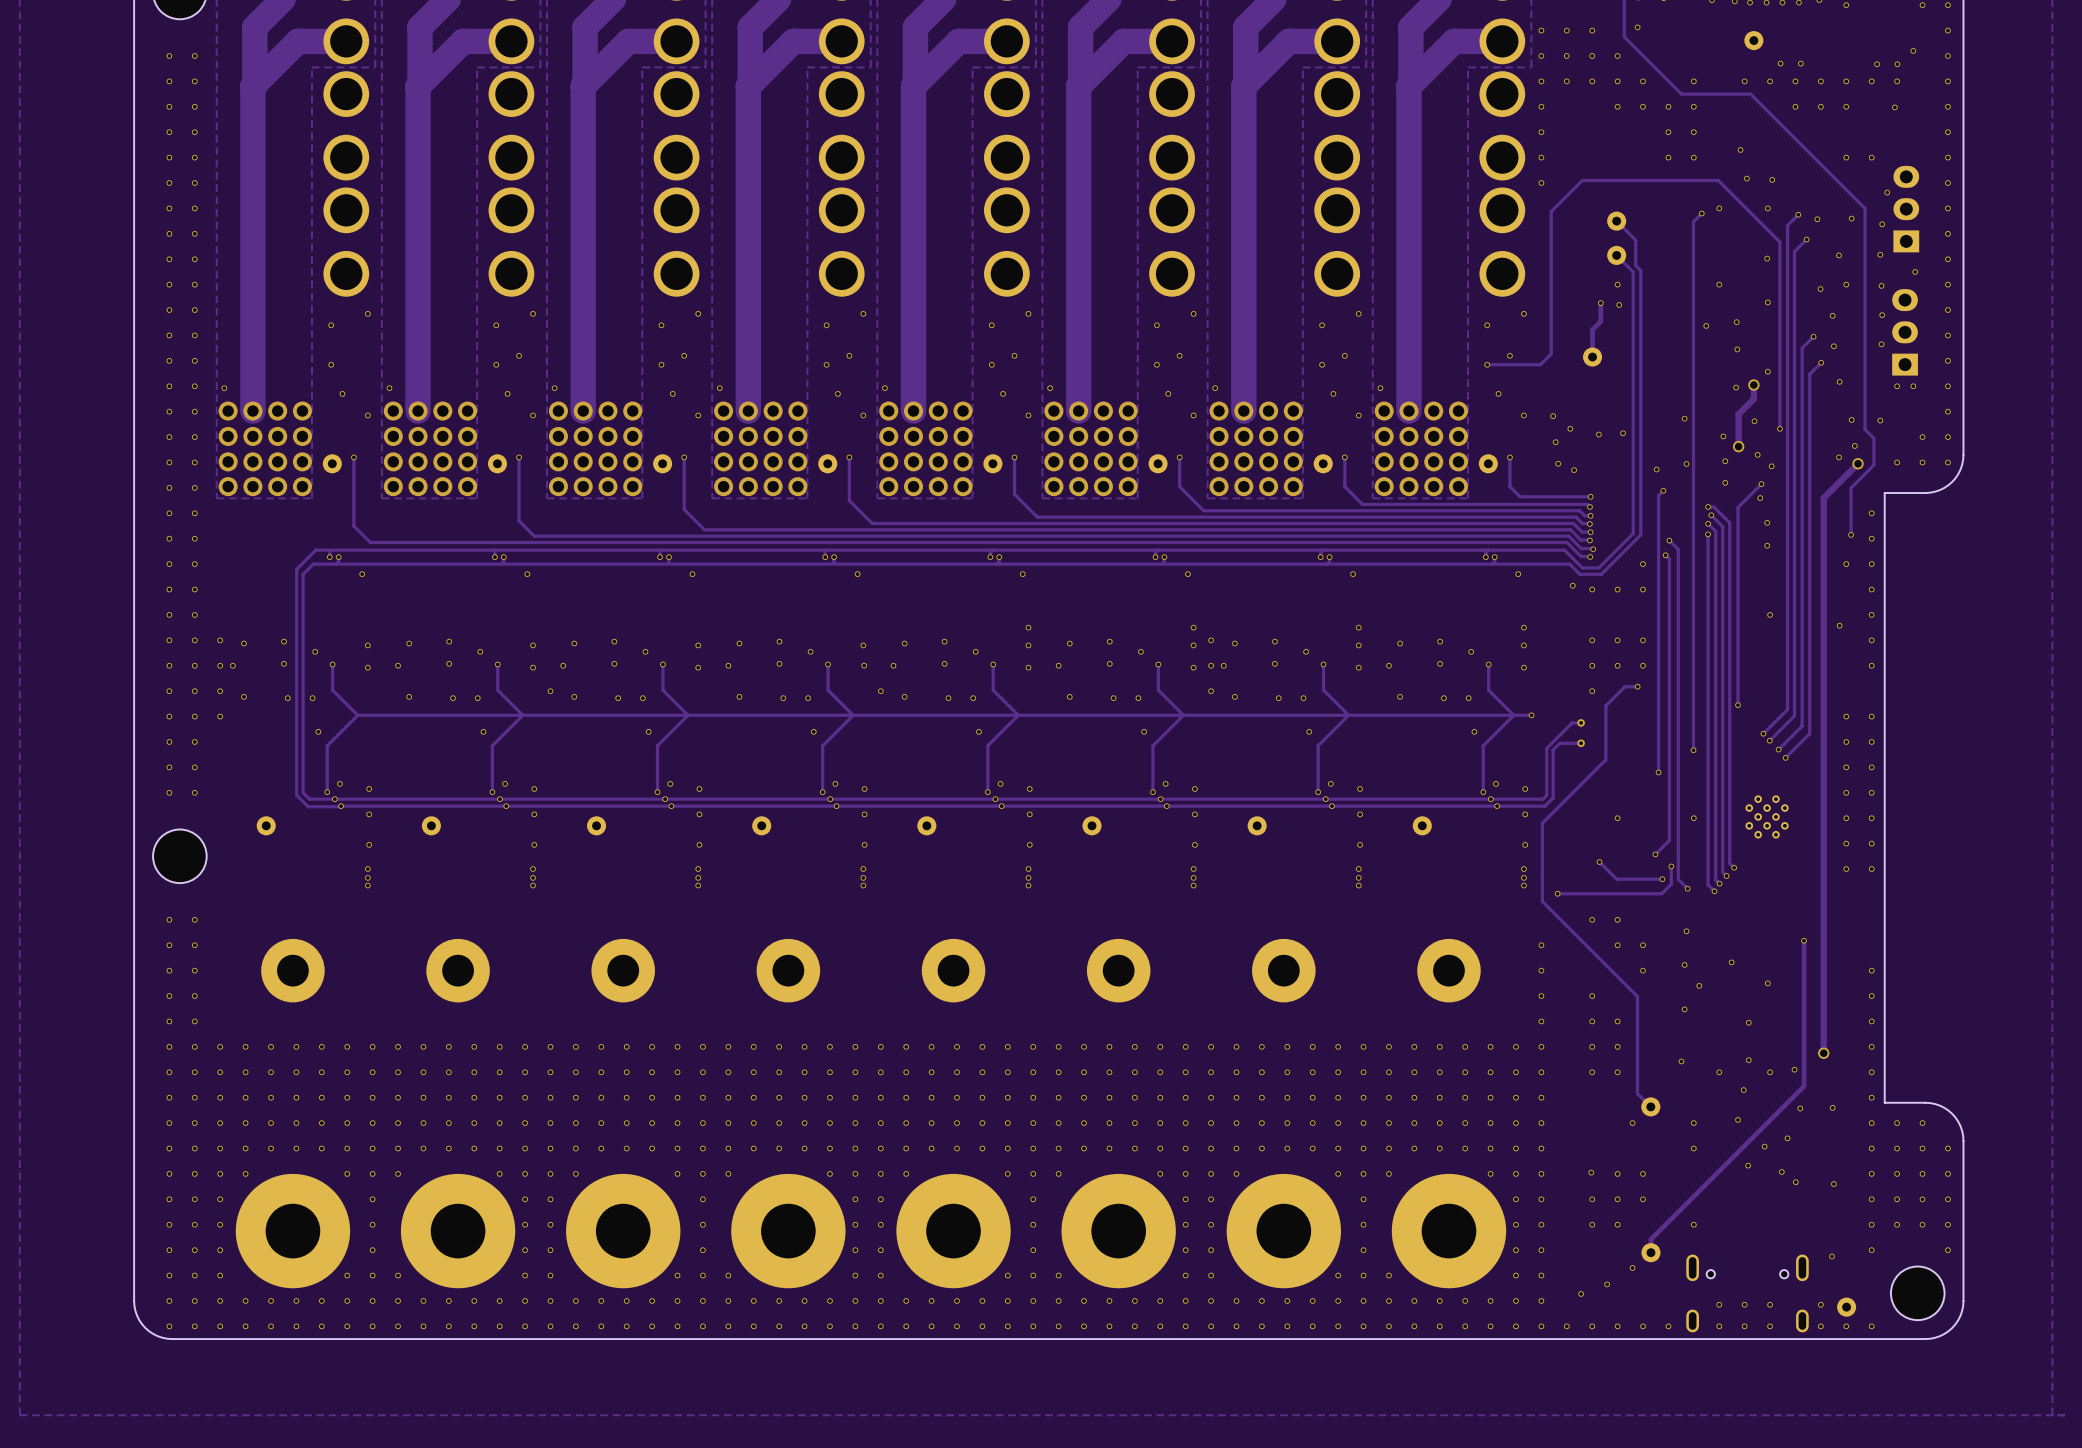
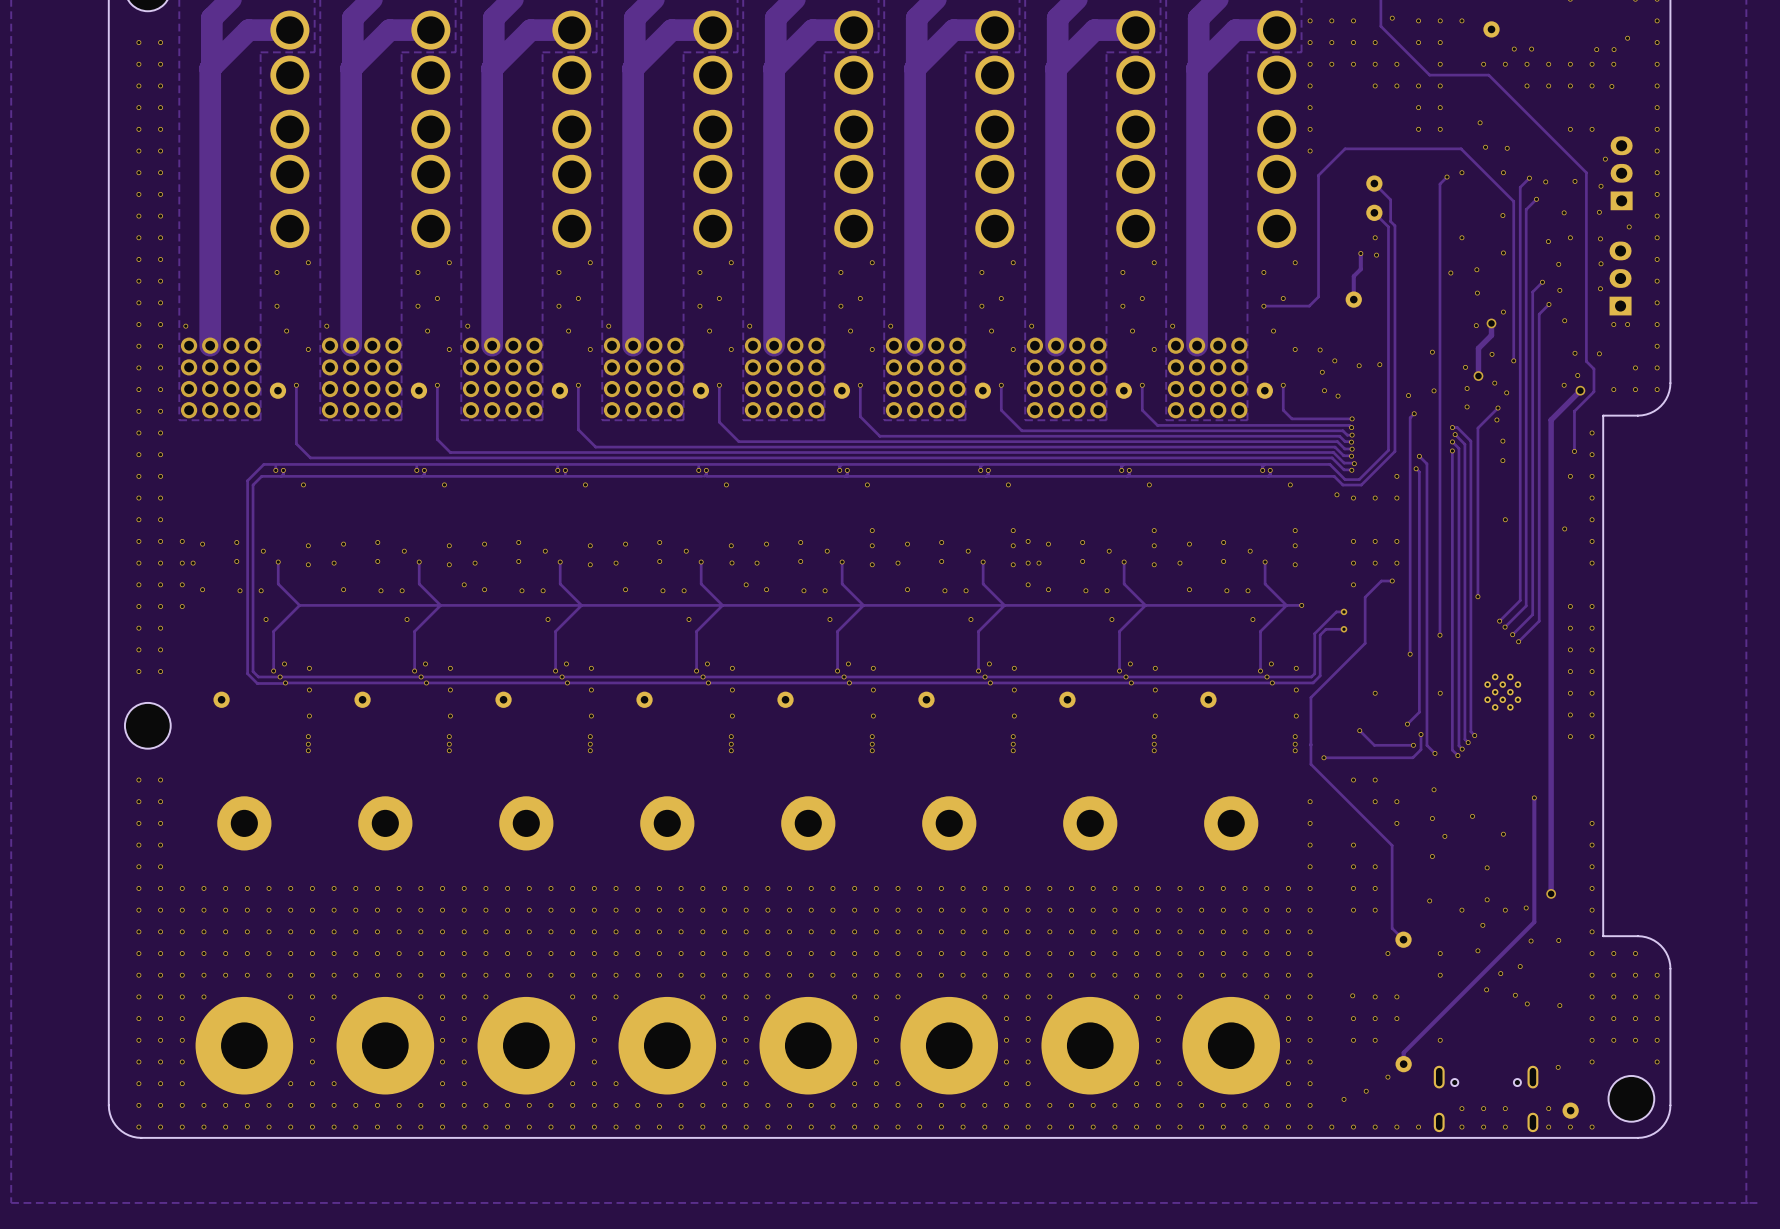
via: none -> (1418, 20)
via: none -> (1440, 20)
via: none -> (1461, 20)
via: none -> (1418, 42)
via: none -> (1440, 42)
via: none -> (1592, 85)

